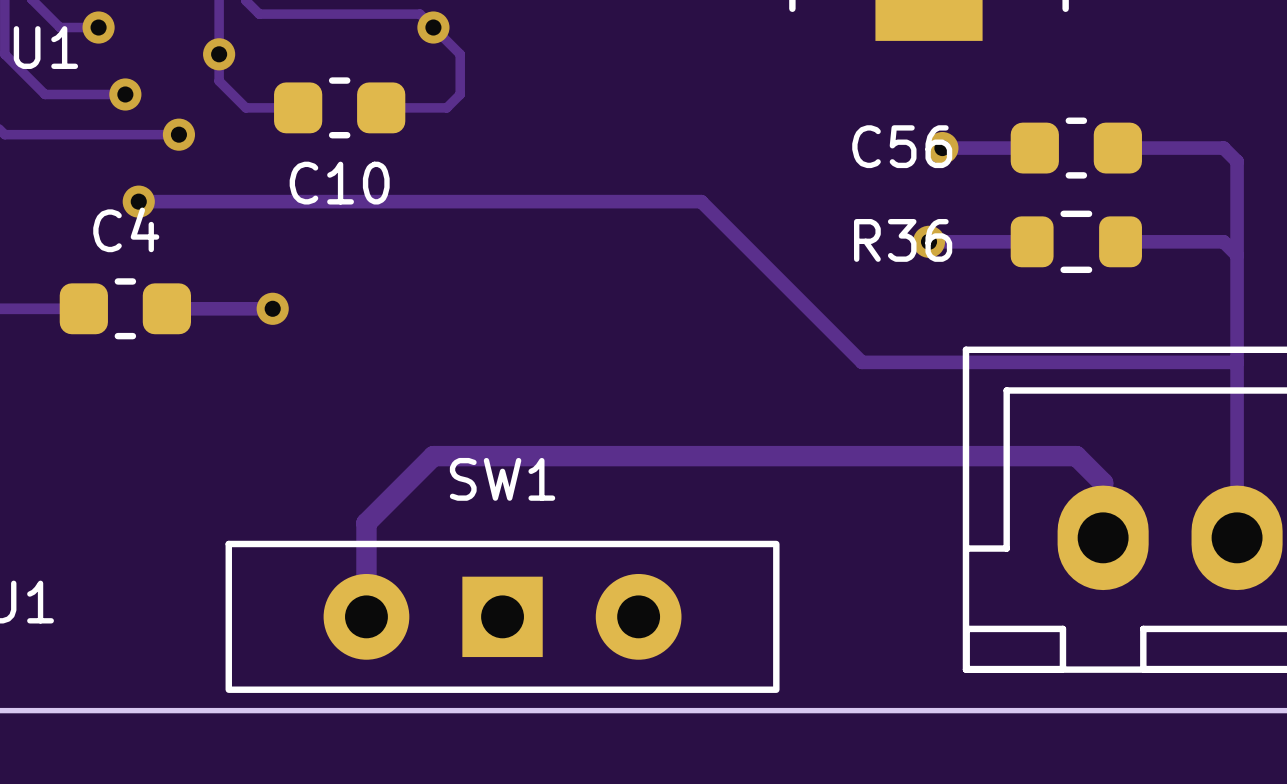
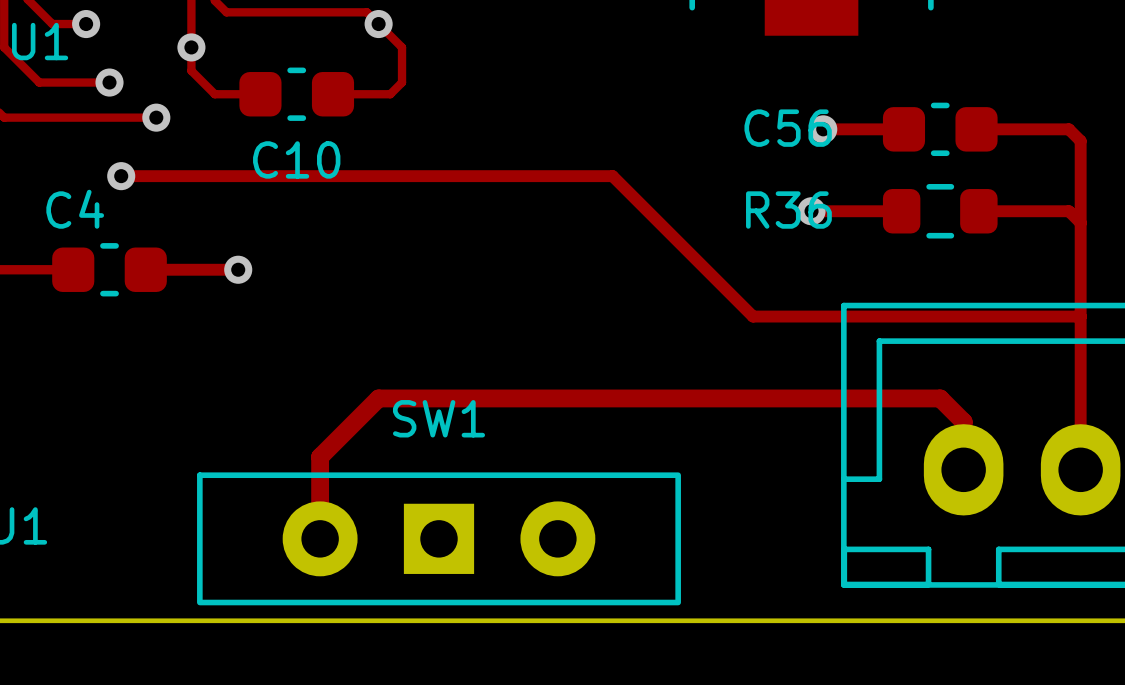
C4 name position: C4 (126, 229) -> C4 (75, 209)

